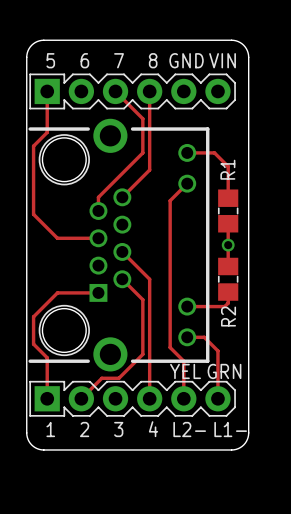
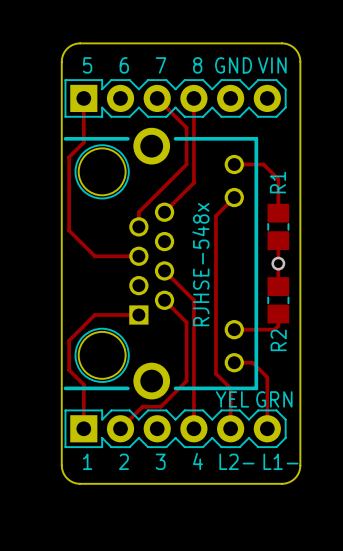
text: none -> RJHSE-548x (200, 264)

